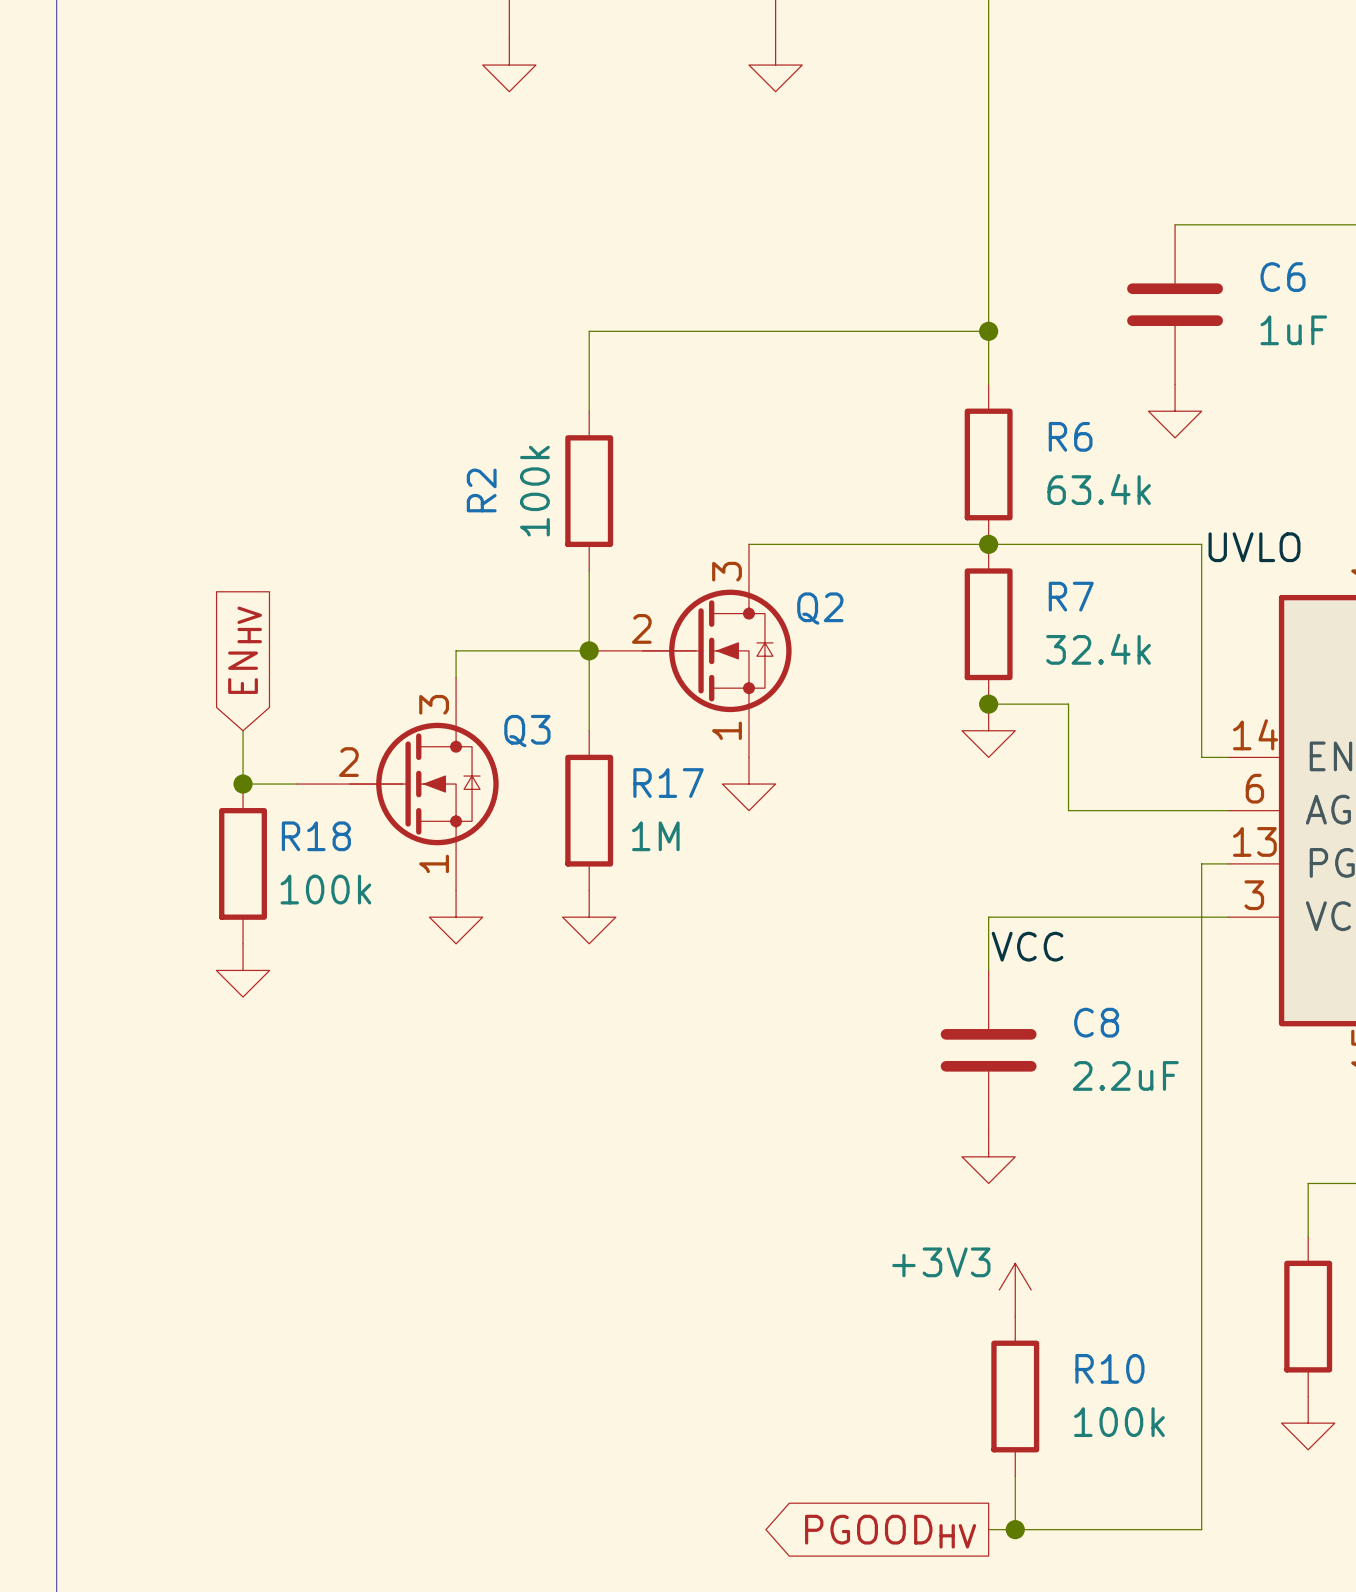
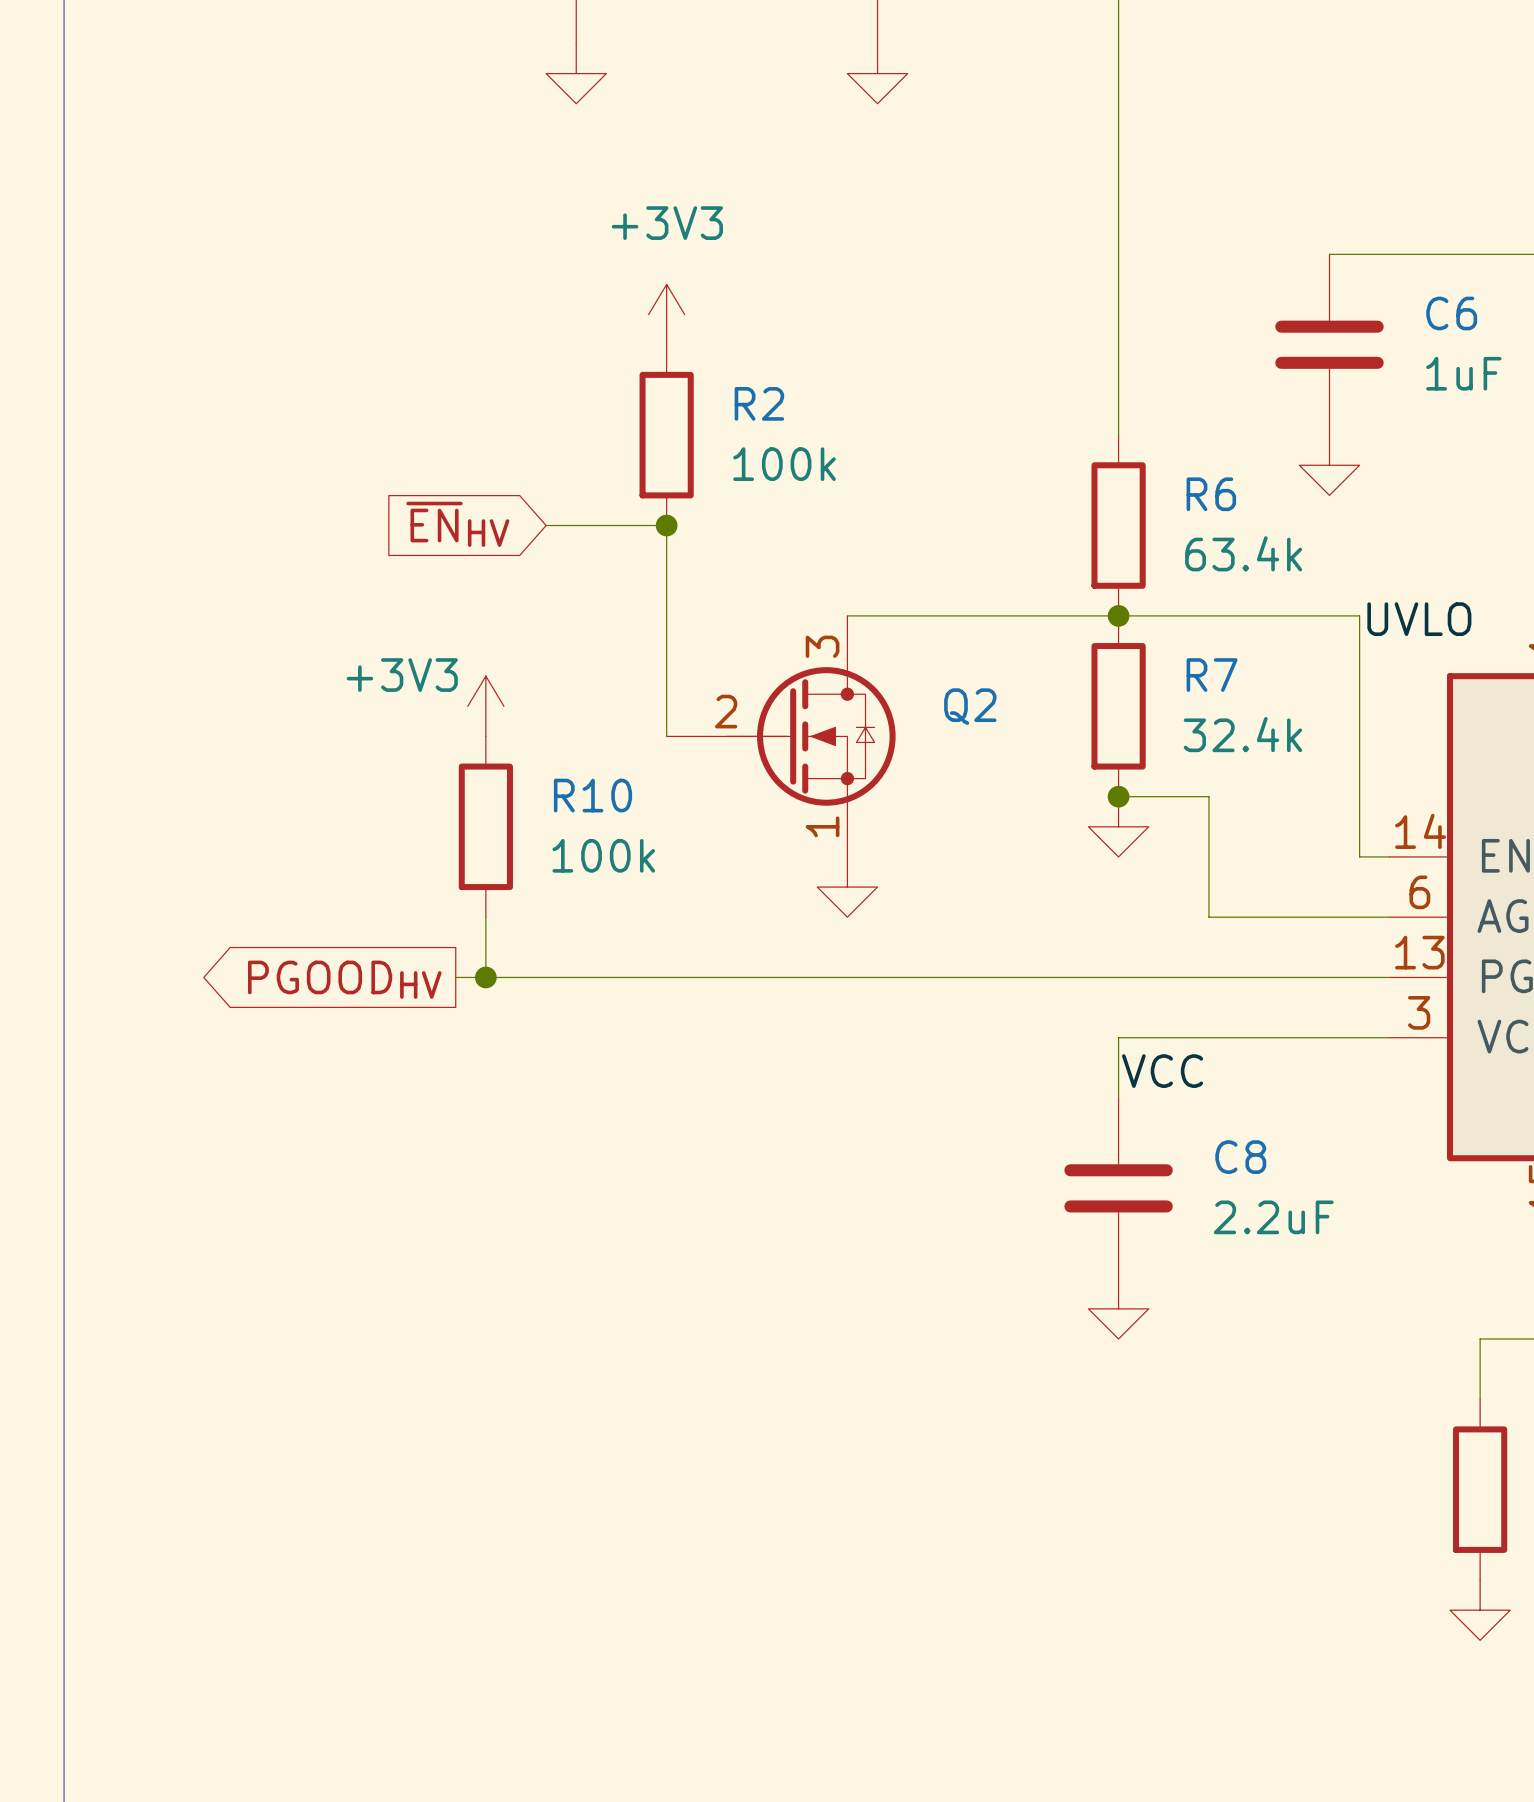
power symbol: none -> +3V3 (666, 314)
wire: (988, 331) (589, 331) (589, 411) -> none
junction: (988, 331) -> none
wire: none -> (546, 525) (666, 525) (666, 646)
junction: none -> (666, 525)
R2 name rotation: 0° (481, 490) -> 90° clockwise (759, 403)
R2 name position: R2 (481, 490) -> R2 (759, 403)
R2 value rotation: 0° (534, 491) -> 90° clockwise (784, 464)
R2 value position: 100k (534, 491) -> 100k (784, 464)
R2 position: (589, 491) -> (666, 435)
Q2 name position: Q2 (820, 608) -> Q2 (970, 706)
power symbol: none -> +3V3 (485, 706)
global label: ENHV (245, 650) -> ~{EN}HV (457, 524)
junction: (589, 650) -> none
wire: (456, 677) (456, 650) (589, 650) (589, 730) -> none
wire: (243, 730) (243, 784) (296, 784) -> none
junction: (243, 784) -> none
Q3: (397, 784) -> none
wire: none -> (485, 917) (485, 977)
R17: 1M (589, 810) -> none
R18: 100k (243, 863) -> none
junction: none -> (485, 977)
wire: (1201, 863) (1201, 1529) (988, 1529) -> (1359, 977) (455, 977)
global label: none -> PGOODHV (344, 979)
power symbol: (456, 917) -> none
power symbol: (589, 917) -> none
power symbol: (243, 970) -> none
power symbol: +3V3 (1015, 1289) -> none
R10 position: (1015, 1396) -> (485, 826)
wire: (1015, 1476) (1015, 1529) -> none
junction: (1015, 1529) -> none
global label: PGOODHV (890, 1531) -> none

